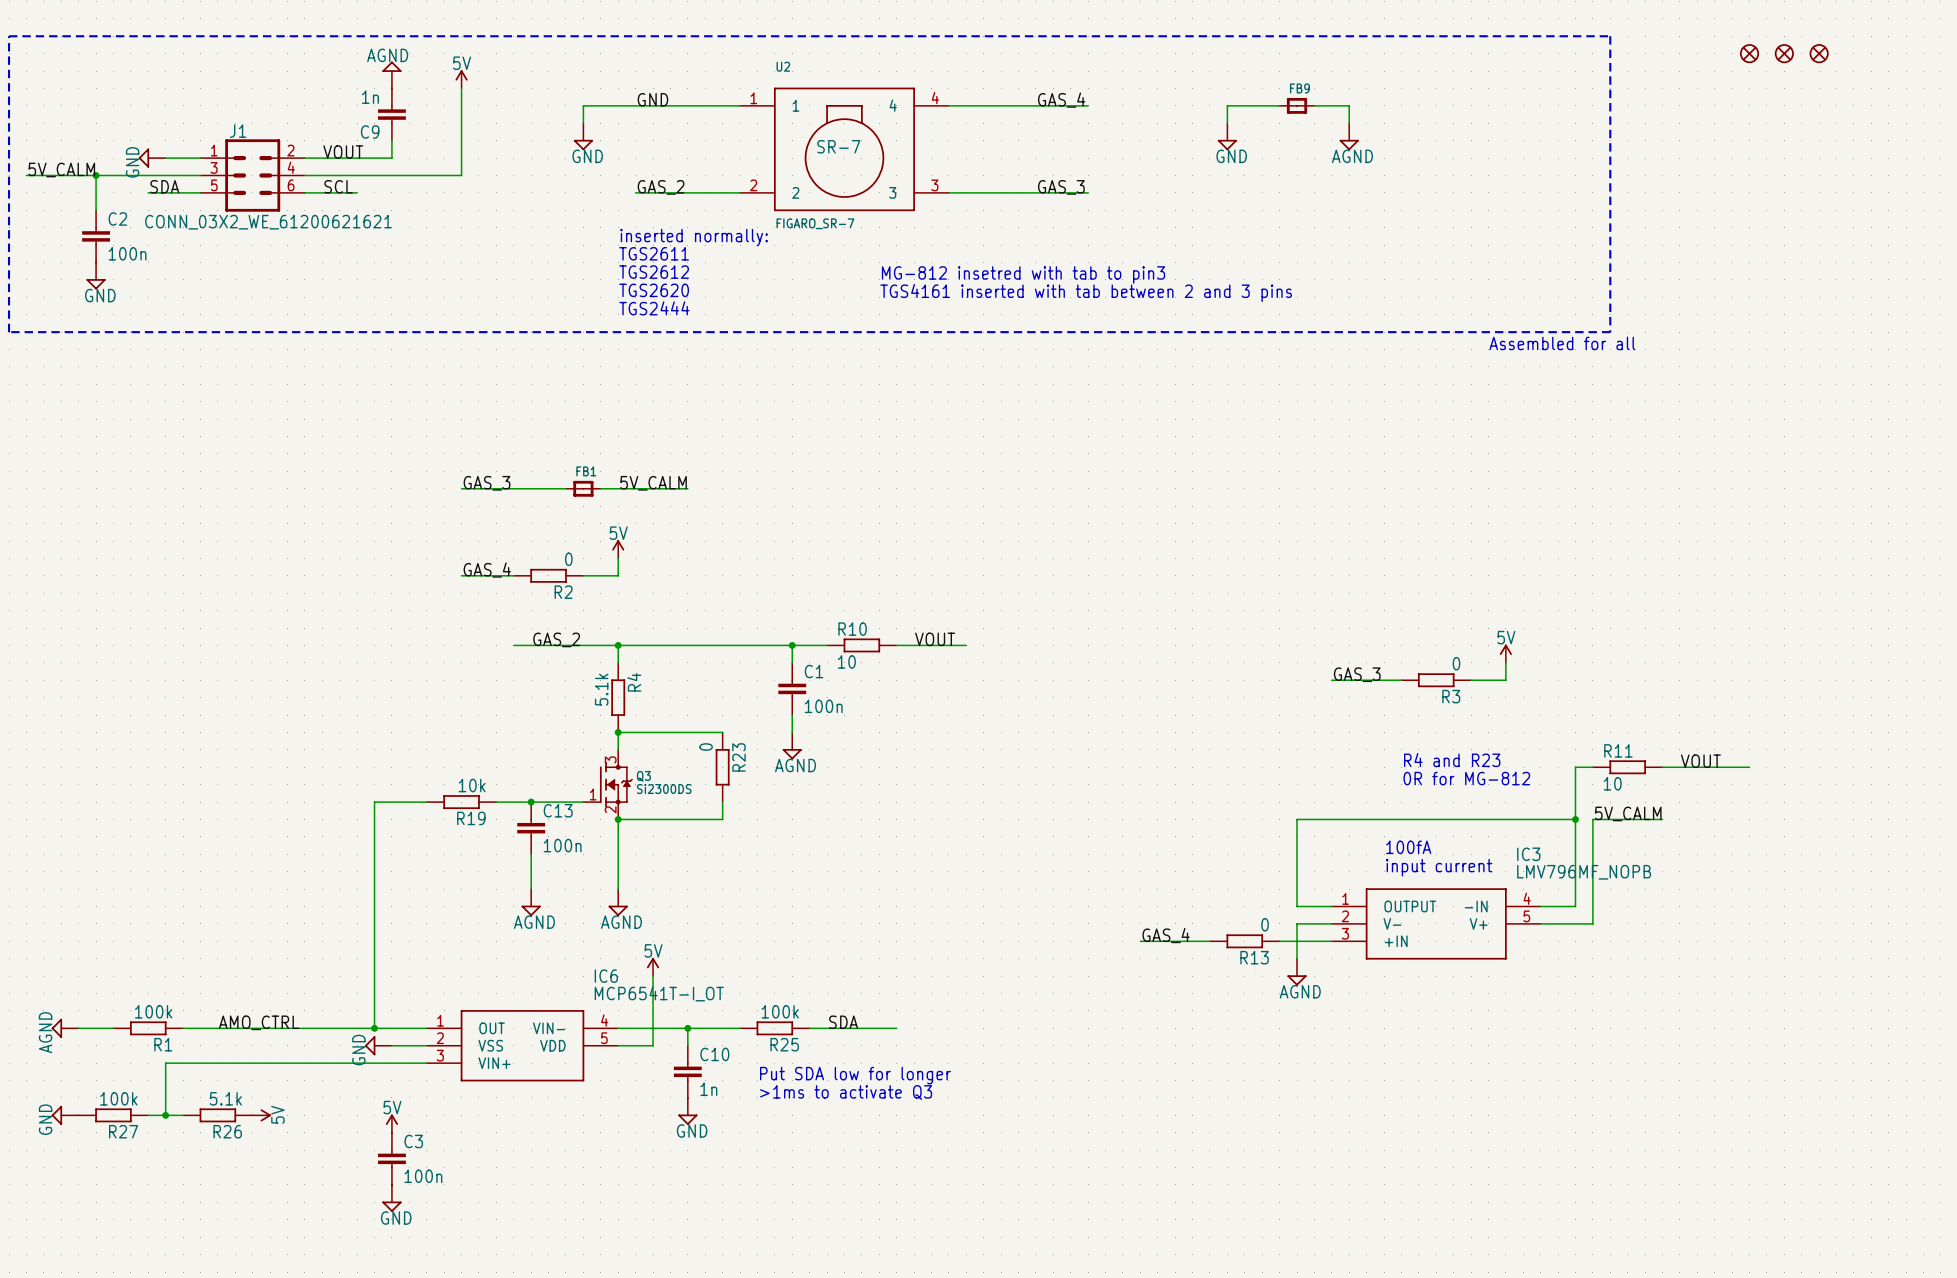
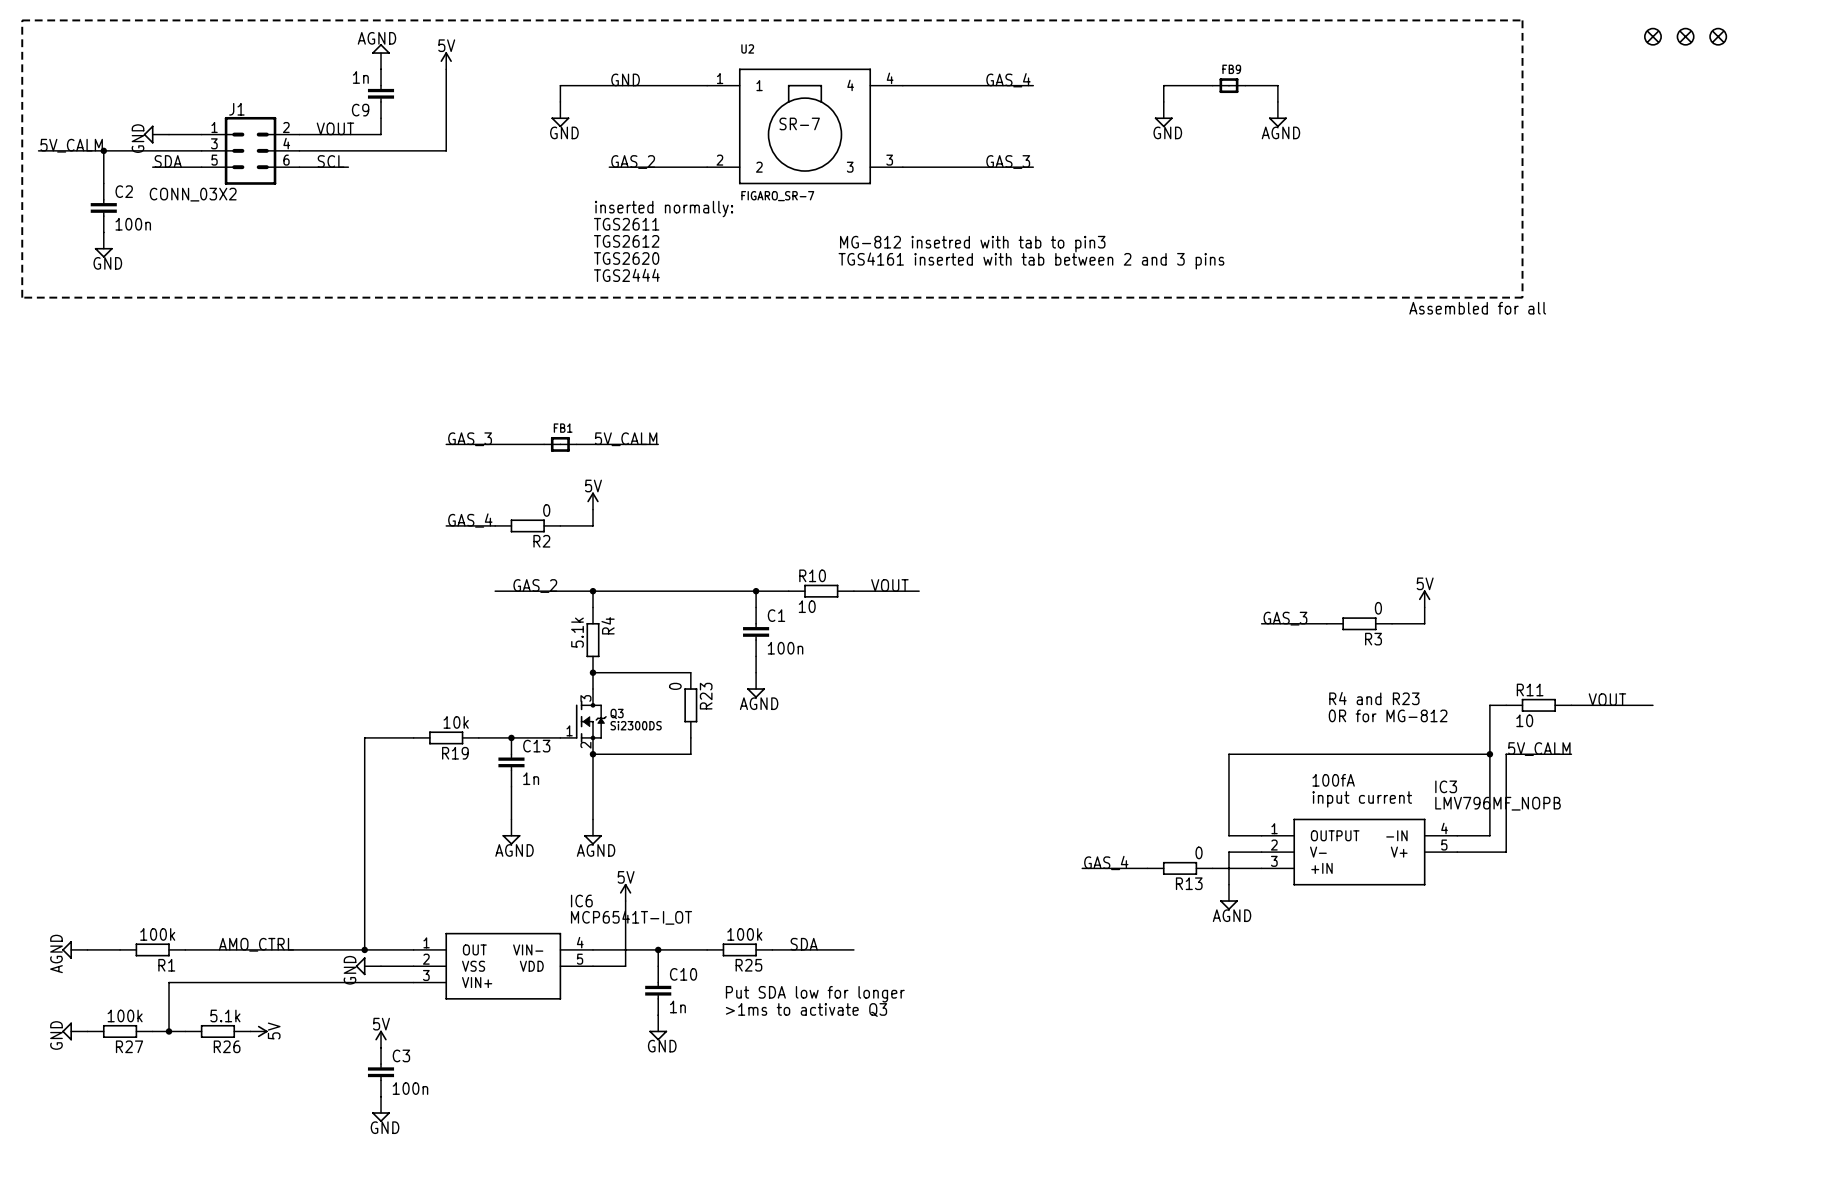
J1 value: CONN_03X2_WE_61200621621 (268, 222) -> CONN_03X2 (193, 194)
C13 value: 100n (562, 845) -> 1n (531, 778)

